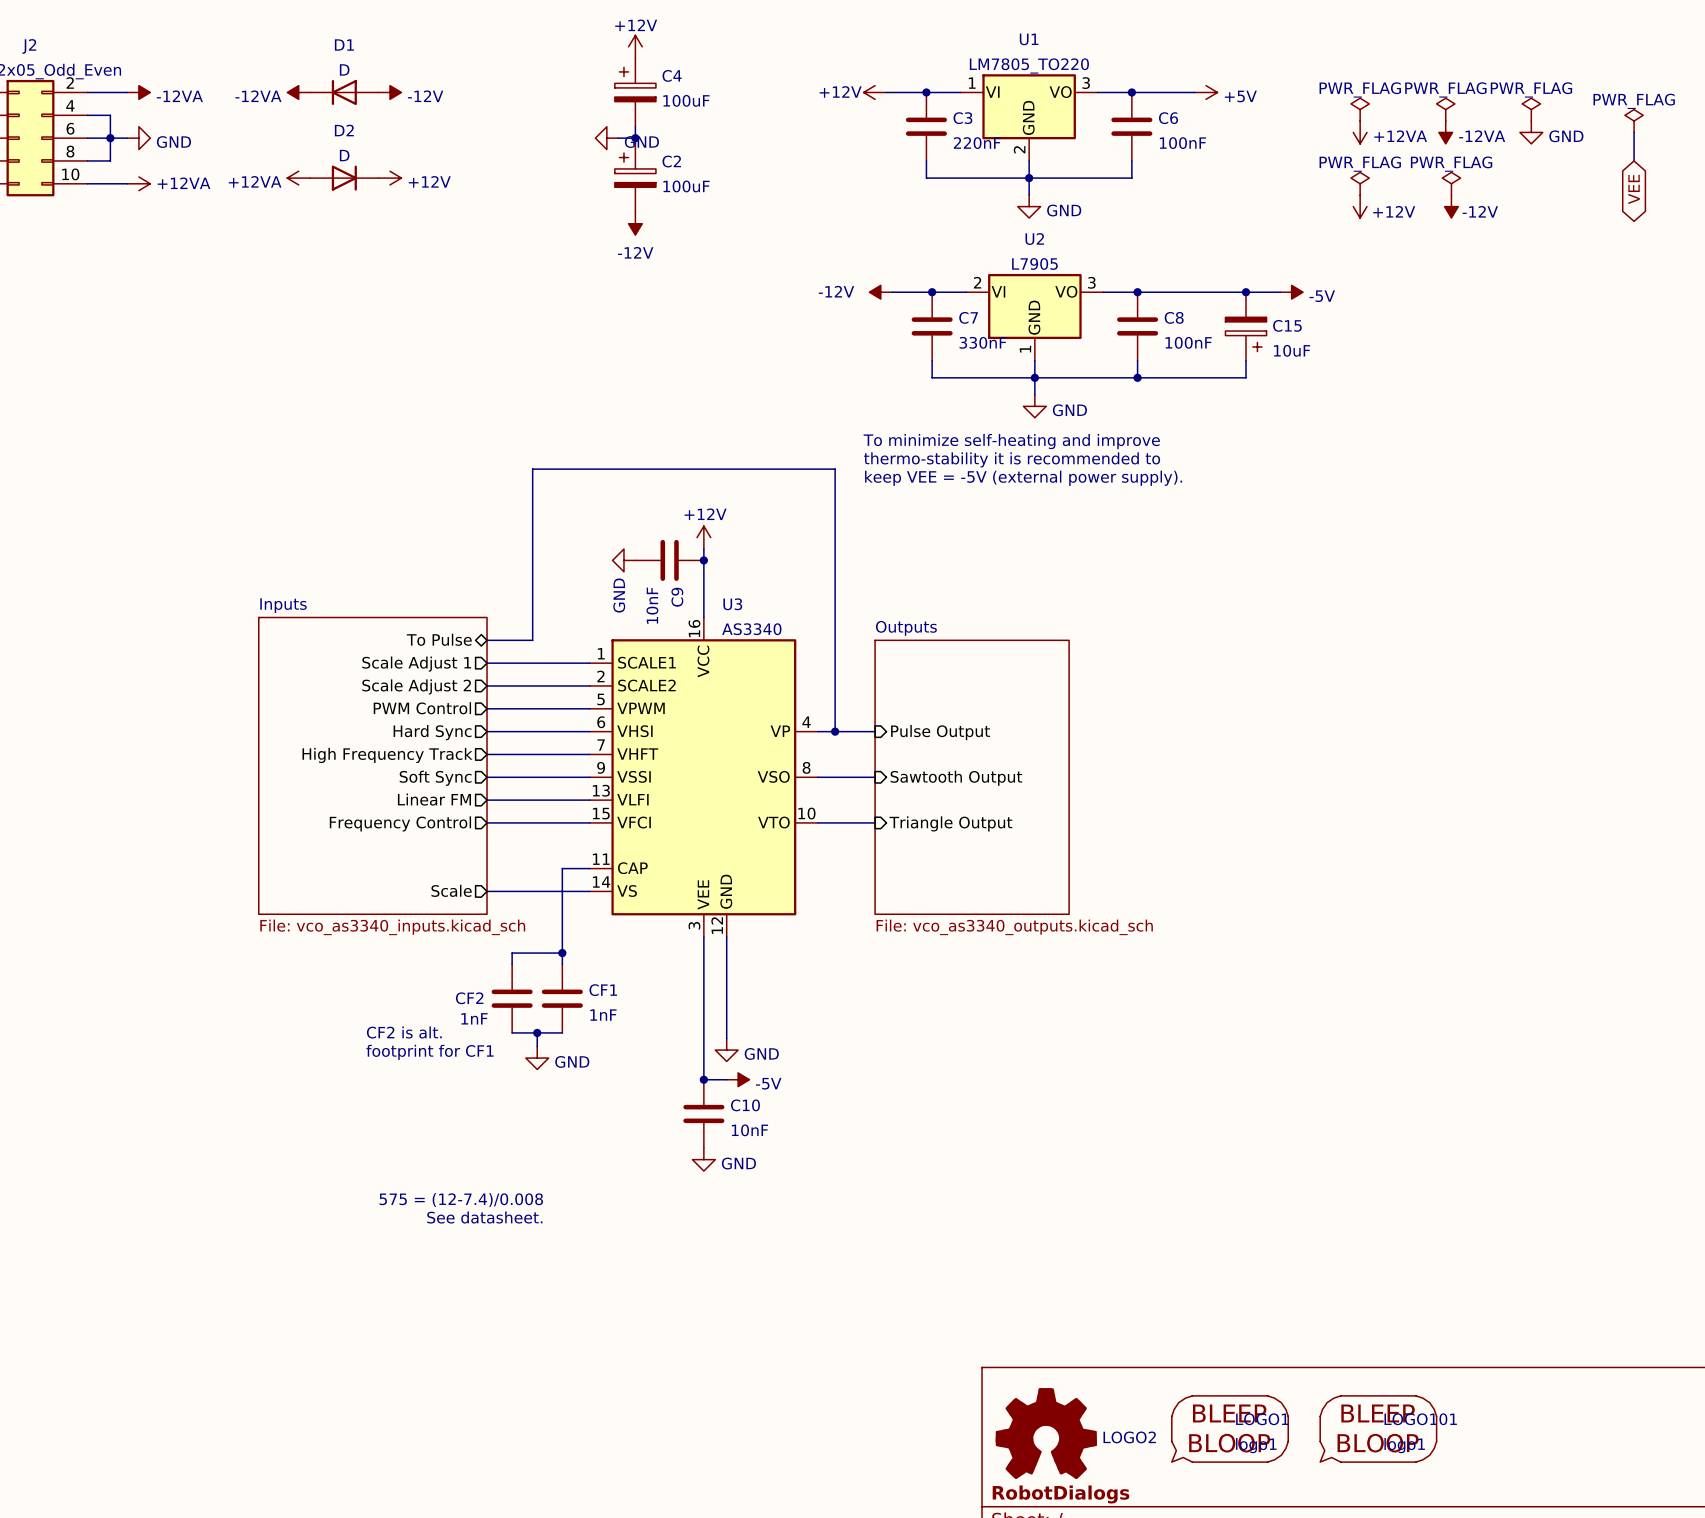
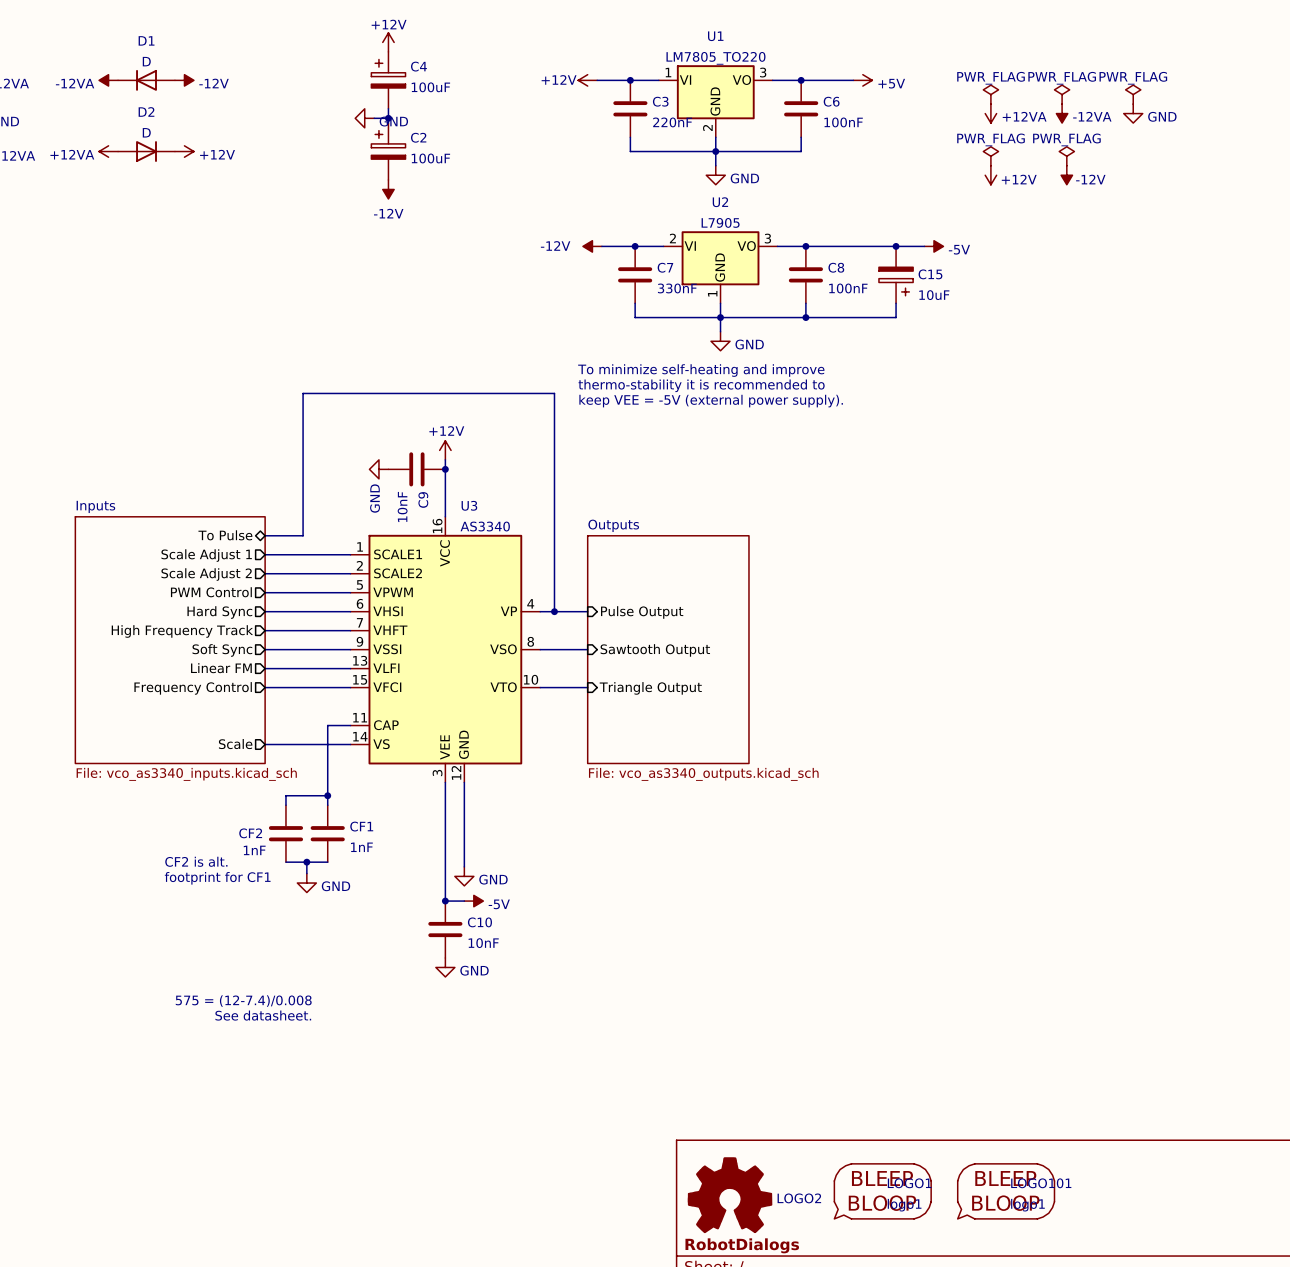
power symbol: PWR_FLAG (1634, 121) -> none
wire: (1634, 132) (1634, 160) -> none
global label: VEE (1634, 189) -> none

